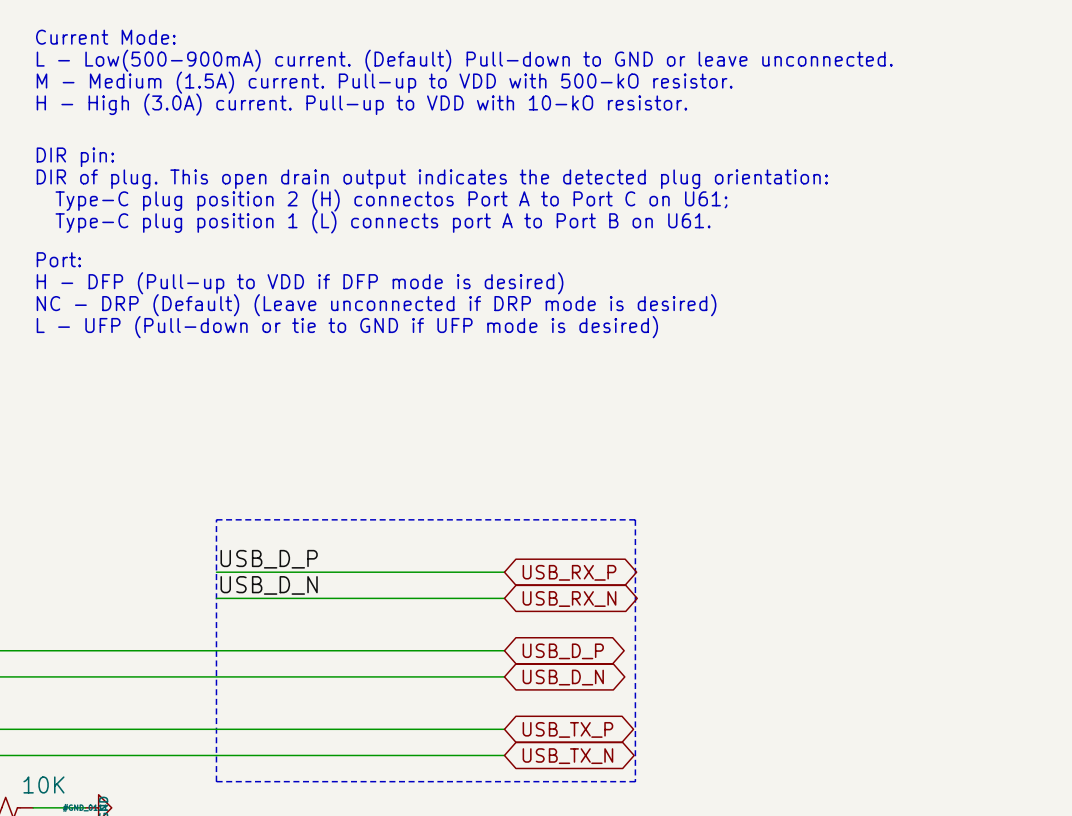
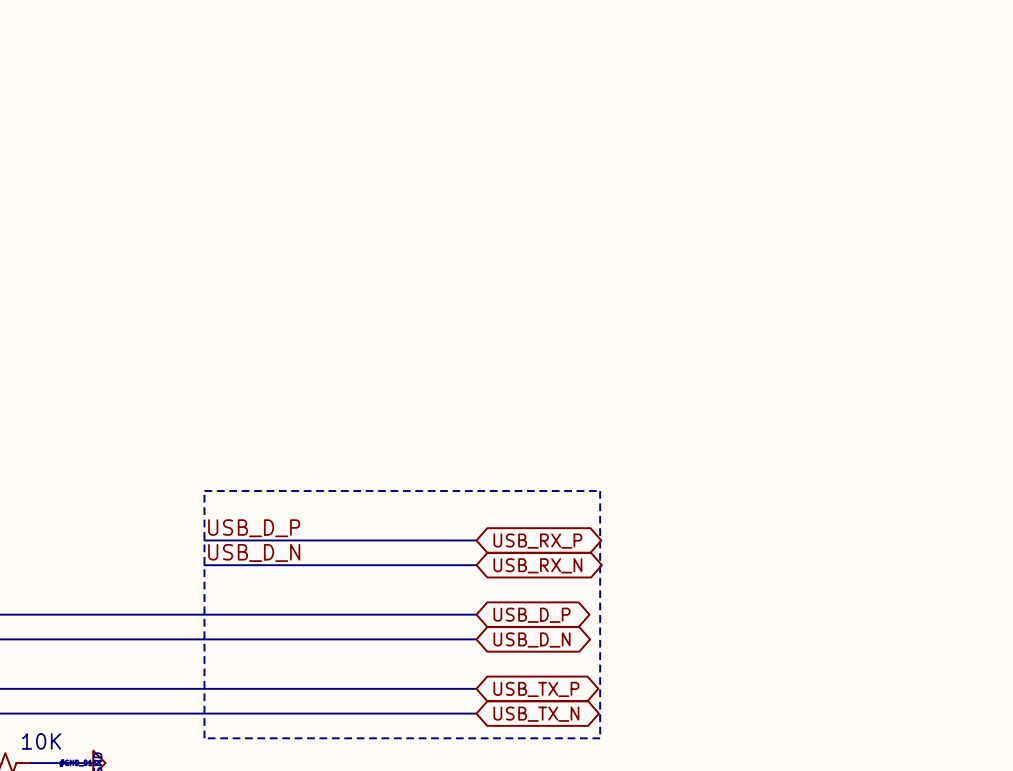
text: Current Mode: (105, 37) -> none
text: L - Low(500-900mA) current. (Default) Pull-down to GND or leave unconnected. (464, 60) -> none
text: M - Medium (1.5A) current. Pull-up to VDD with 500-kO resistor. (384, 82) -> none
text: H - High (3.0A) current. Pull-up to VDD with 10-kO resistor. (361, 104) -> none
text: DIR pin: (75, 157) -> none
text: DIR of plug. This open drain output indicates the detected plug orientation: (432, 179) -> none
text: Type-C plug position 2 (H) connectos Port A to Port C on U61; (391, 200) -> none
text: Type-C plug position 1 (L) connects port A to Port B on U61. (383, 222) -> none
text: Port: (58, 259) -> none
text: H - DFP (Pull-up to VDD if DFP mode is desired) (300, 283) -> none
text: NC - DRP (Default) (Leave unconnected if DRP mode is desired) (376, 305) -> none
text: L - UFP (Pull-down or tie to GND if UFP mode is desired) (347, 327) -> none

